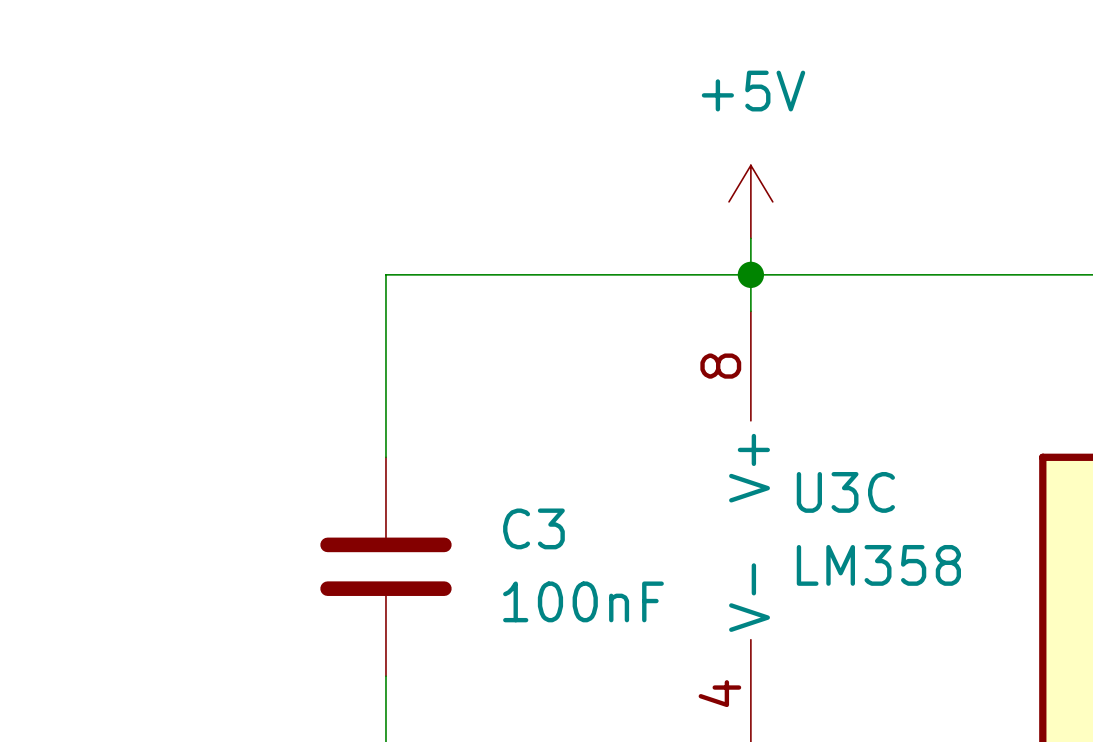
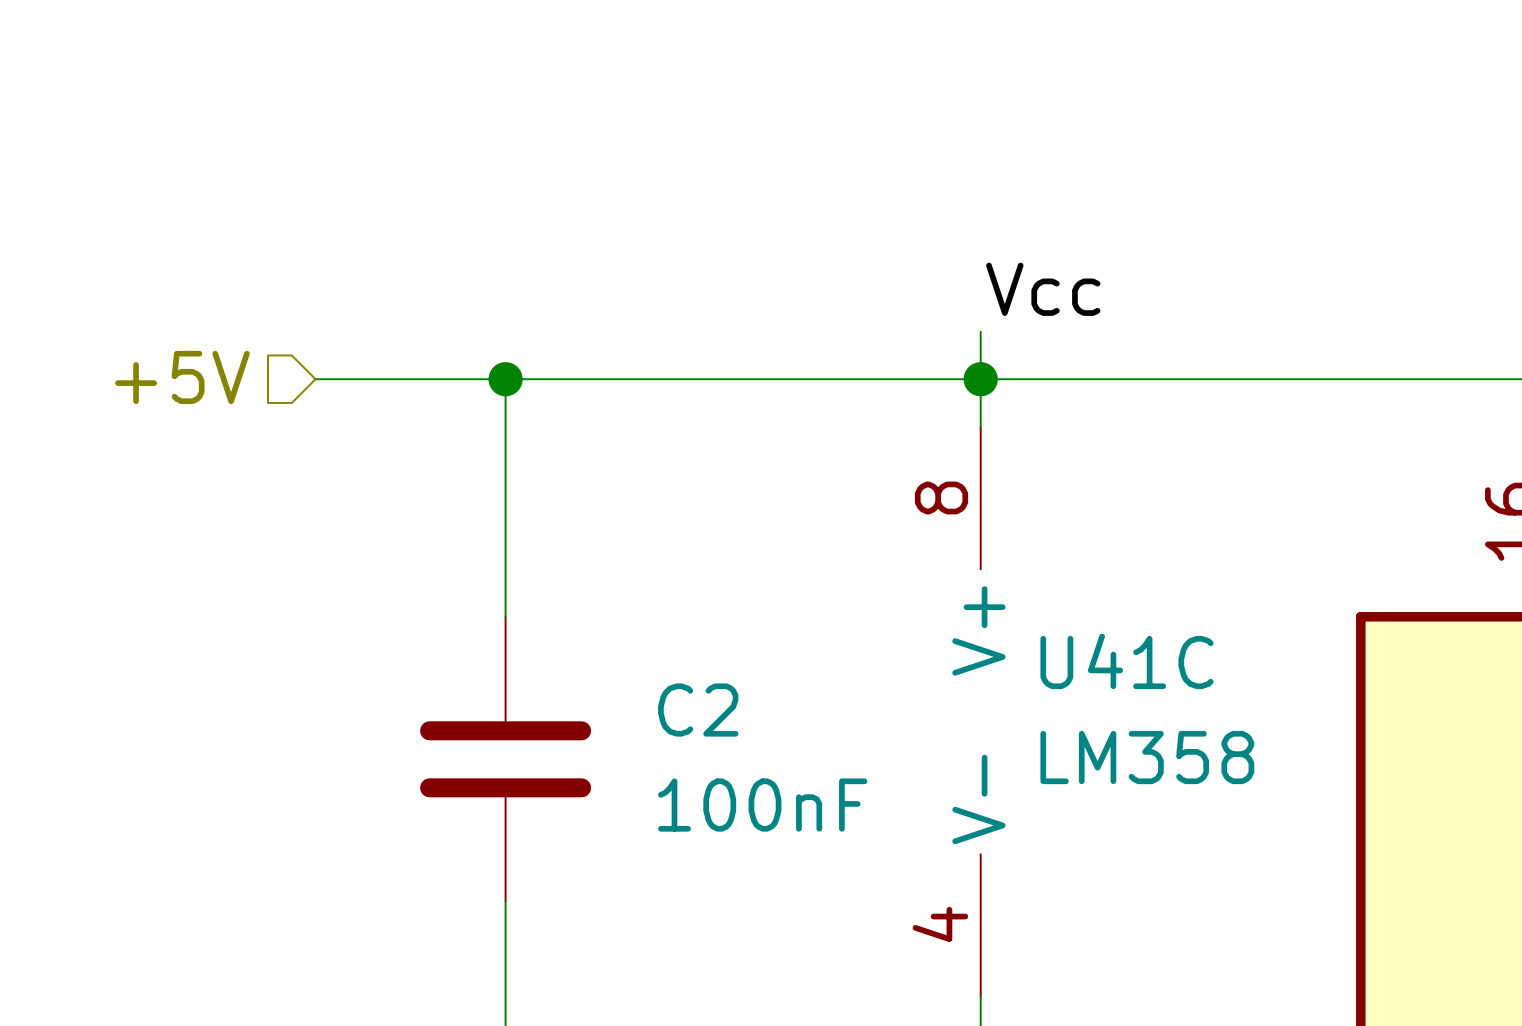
power symbol: +5V (750, 201) -> none
label: none -> Vcc (1043, 289)
hierarchical label: none -> +5V (182, 377)
wire: none -> (315, 379) (505, 379)
junction: none -> (505, 379)
U3C name: U3C (845, 492) -> U41C (1126, 661)
C3 name: C3 (533, 528) -> C2 (698, 710)

